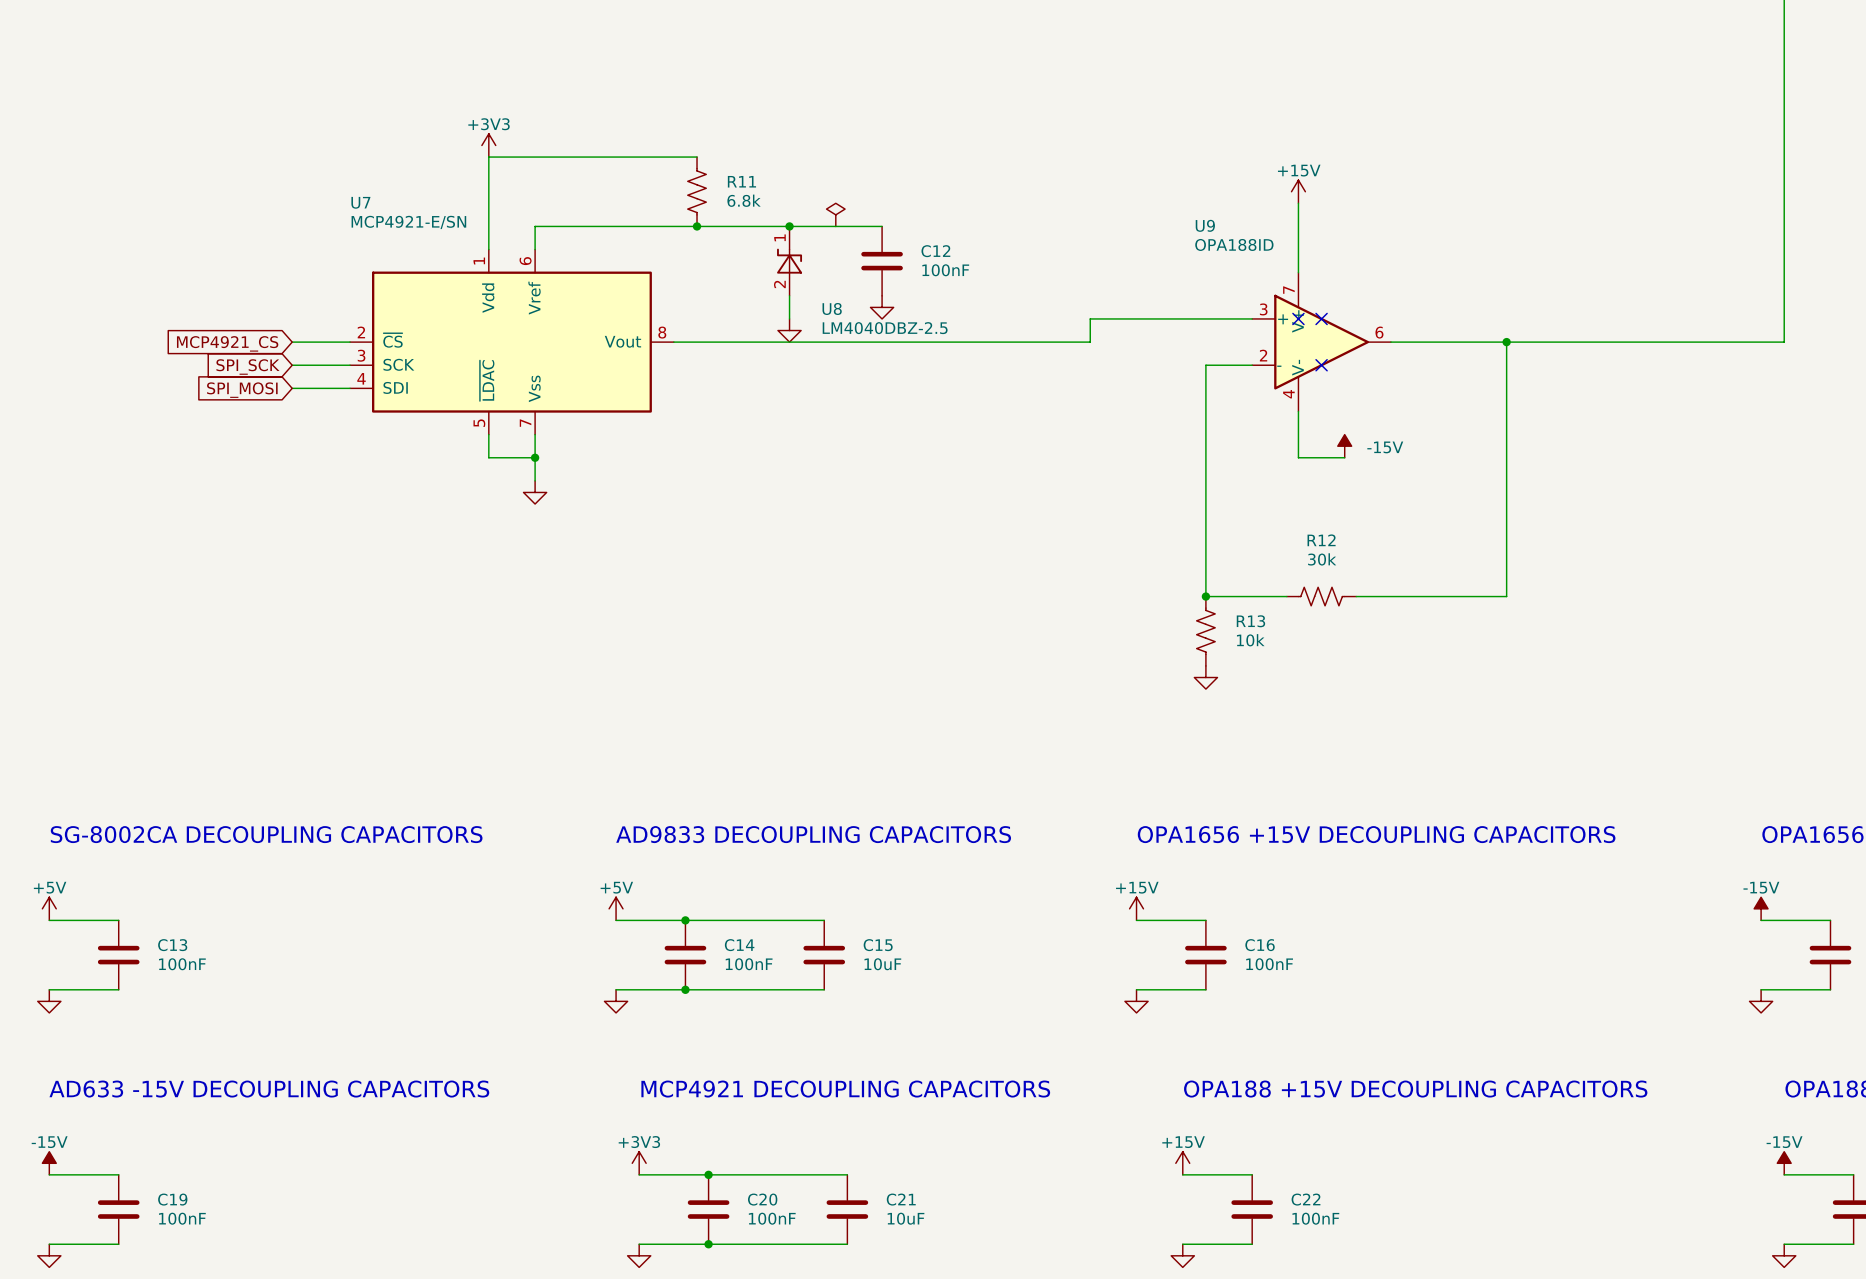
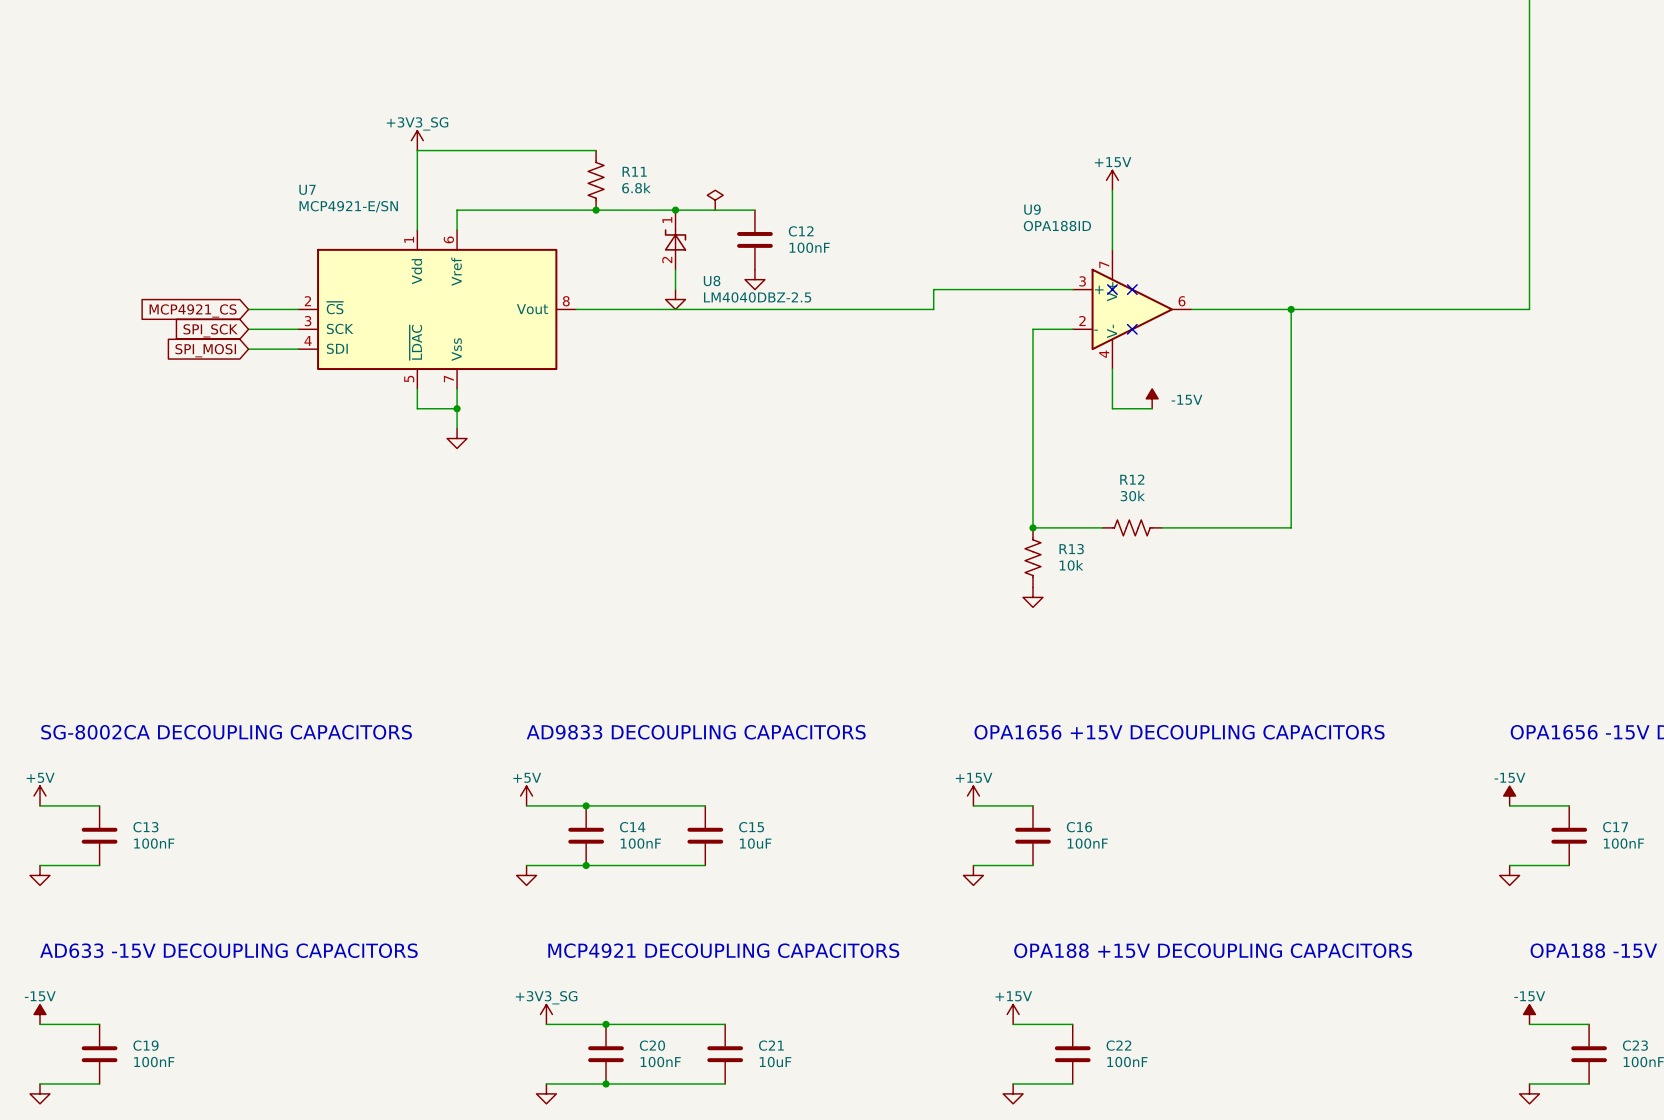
power symbol: +3V3 (488, 145) -> +3V3_SG (417, 140)
power symbol: +3V3 (639, 1163) -> +3V3_SG (546, 1014)

